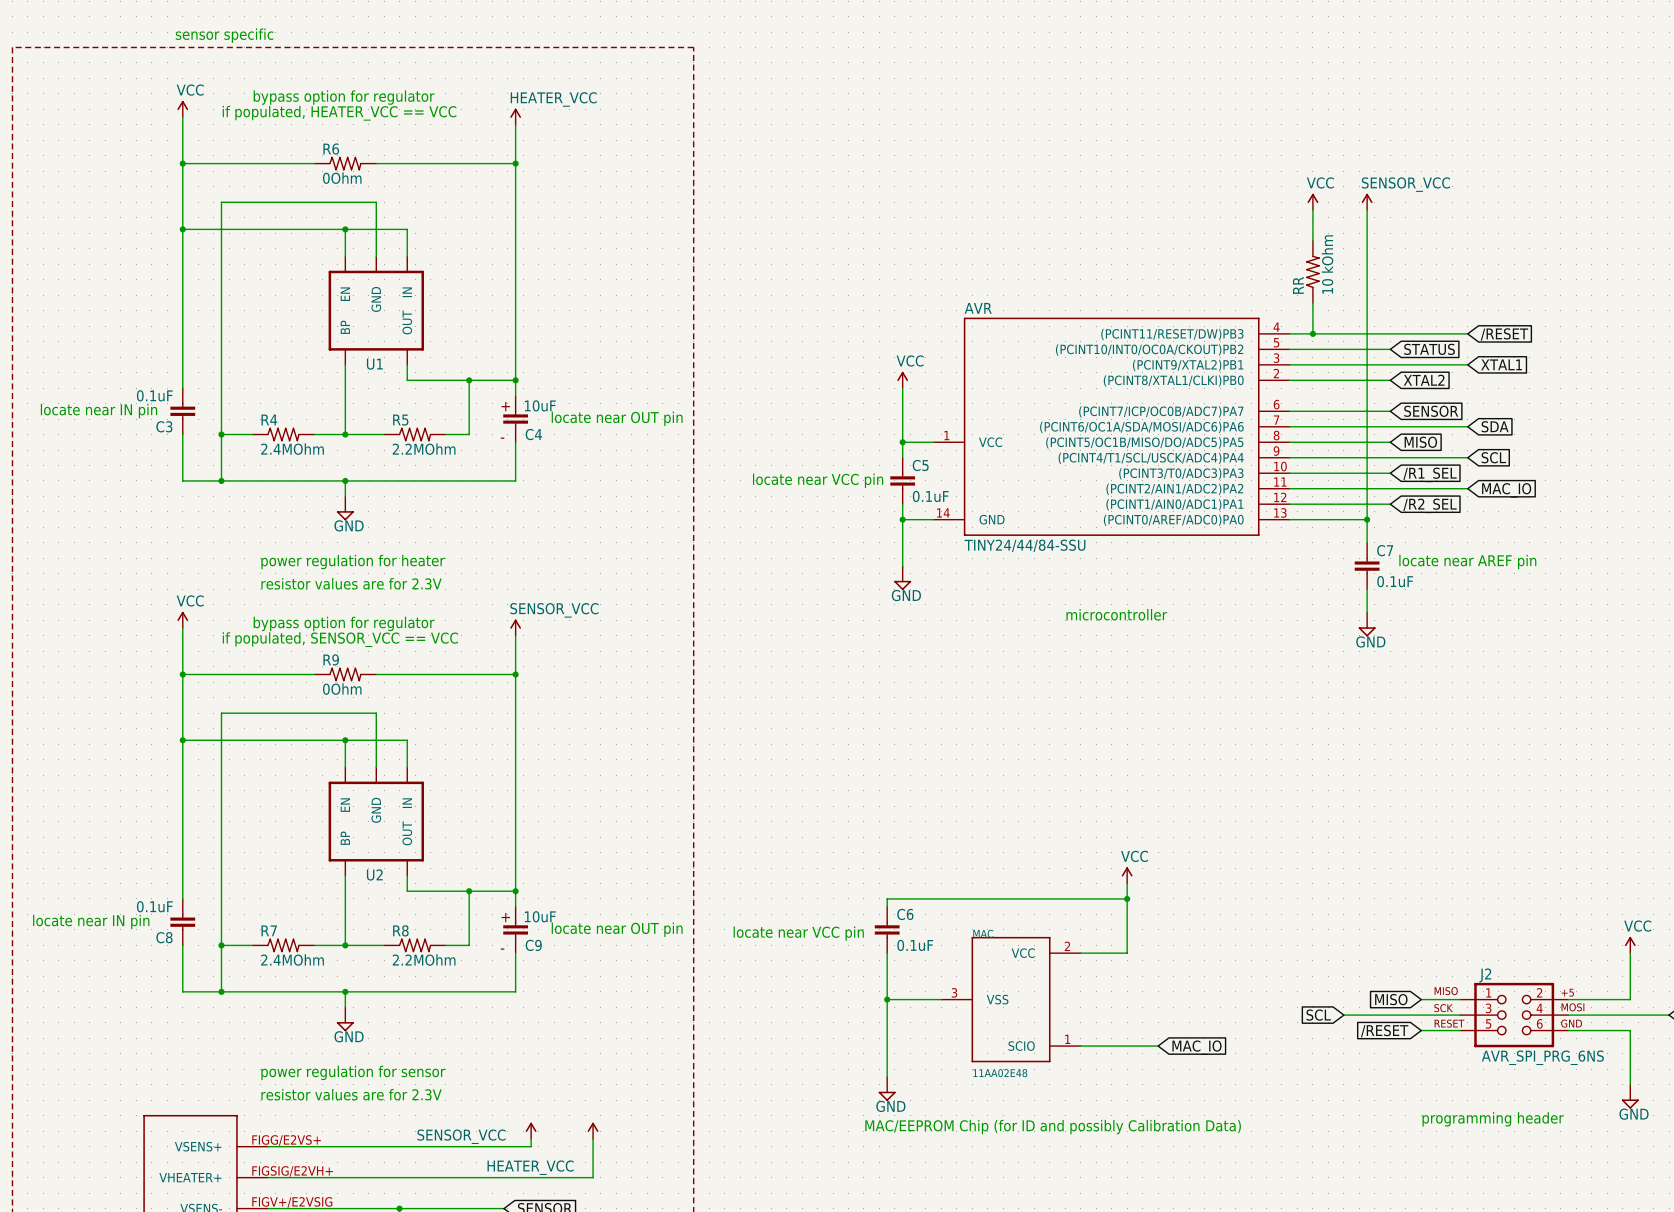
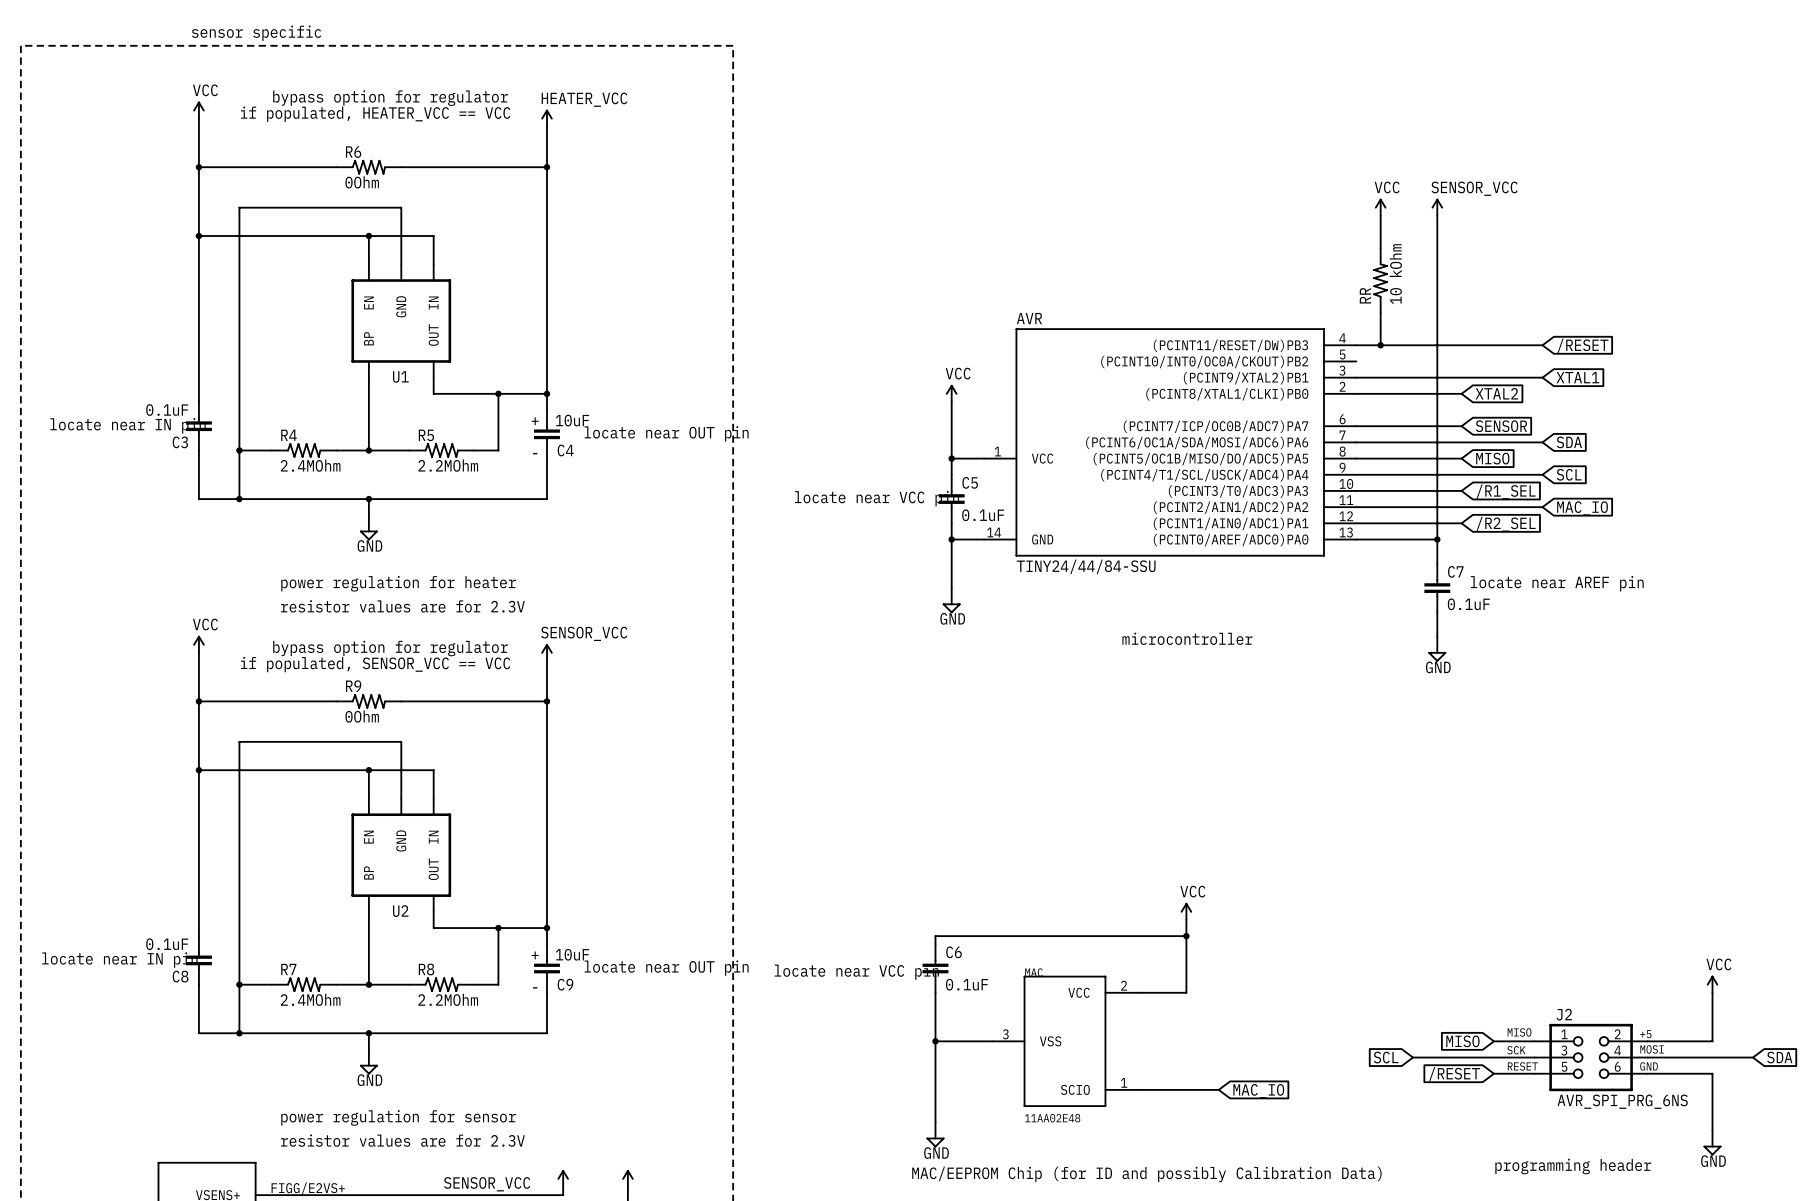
wire: (1289, 349) (1390, 349) -> none
global label: STATUS (1429, 349) -> none

